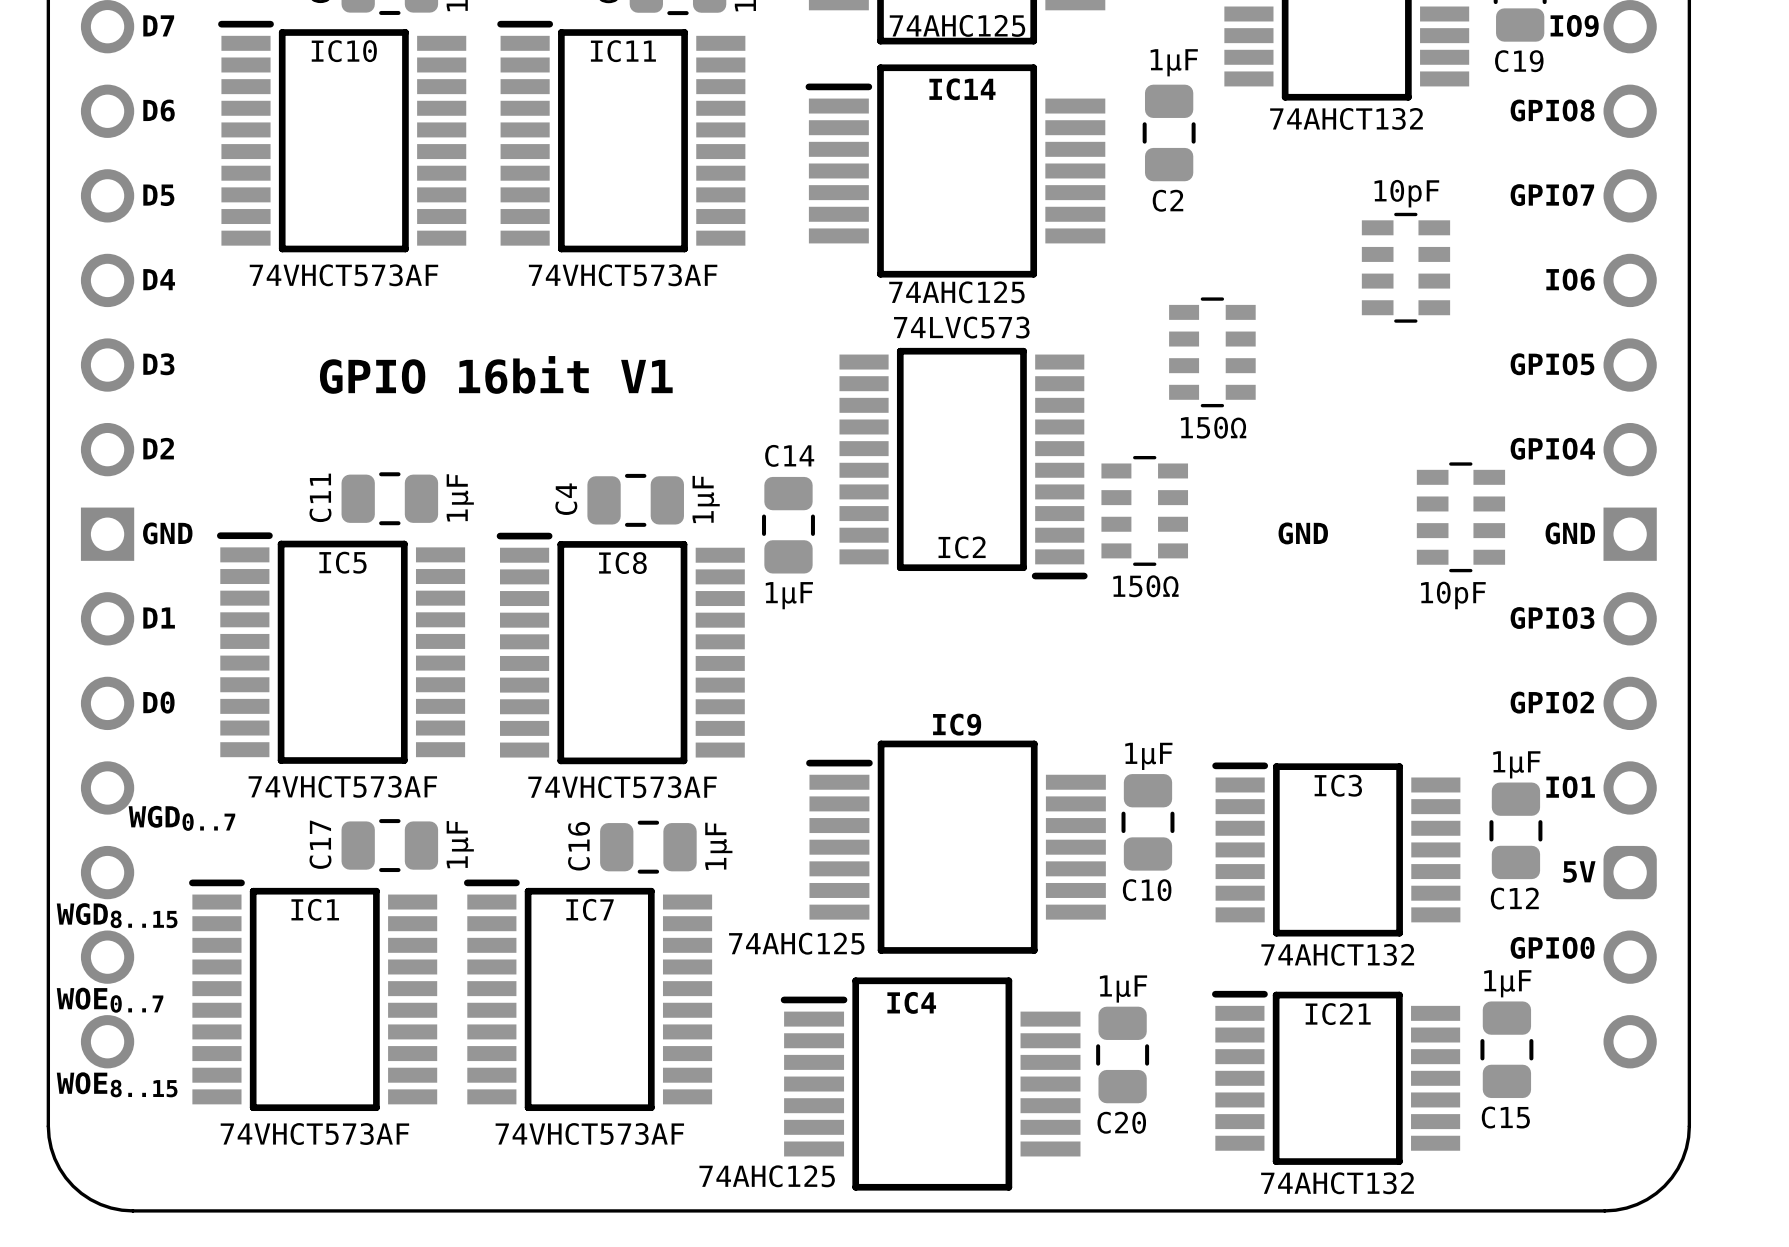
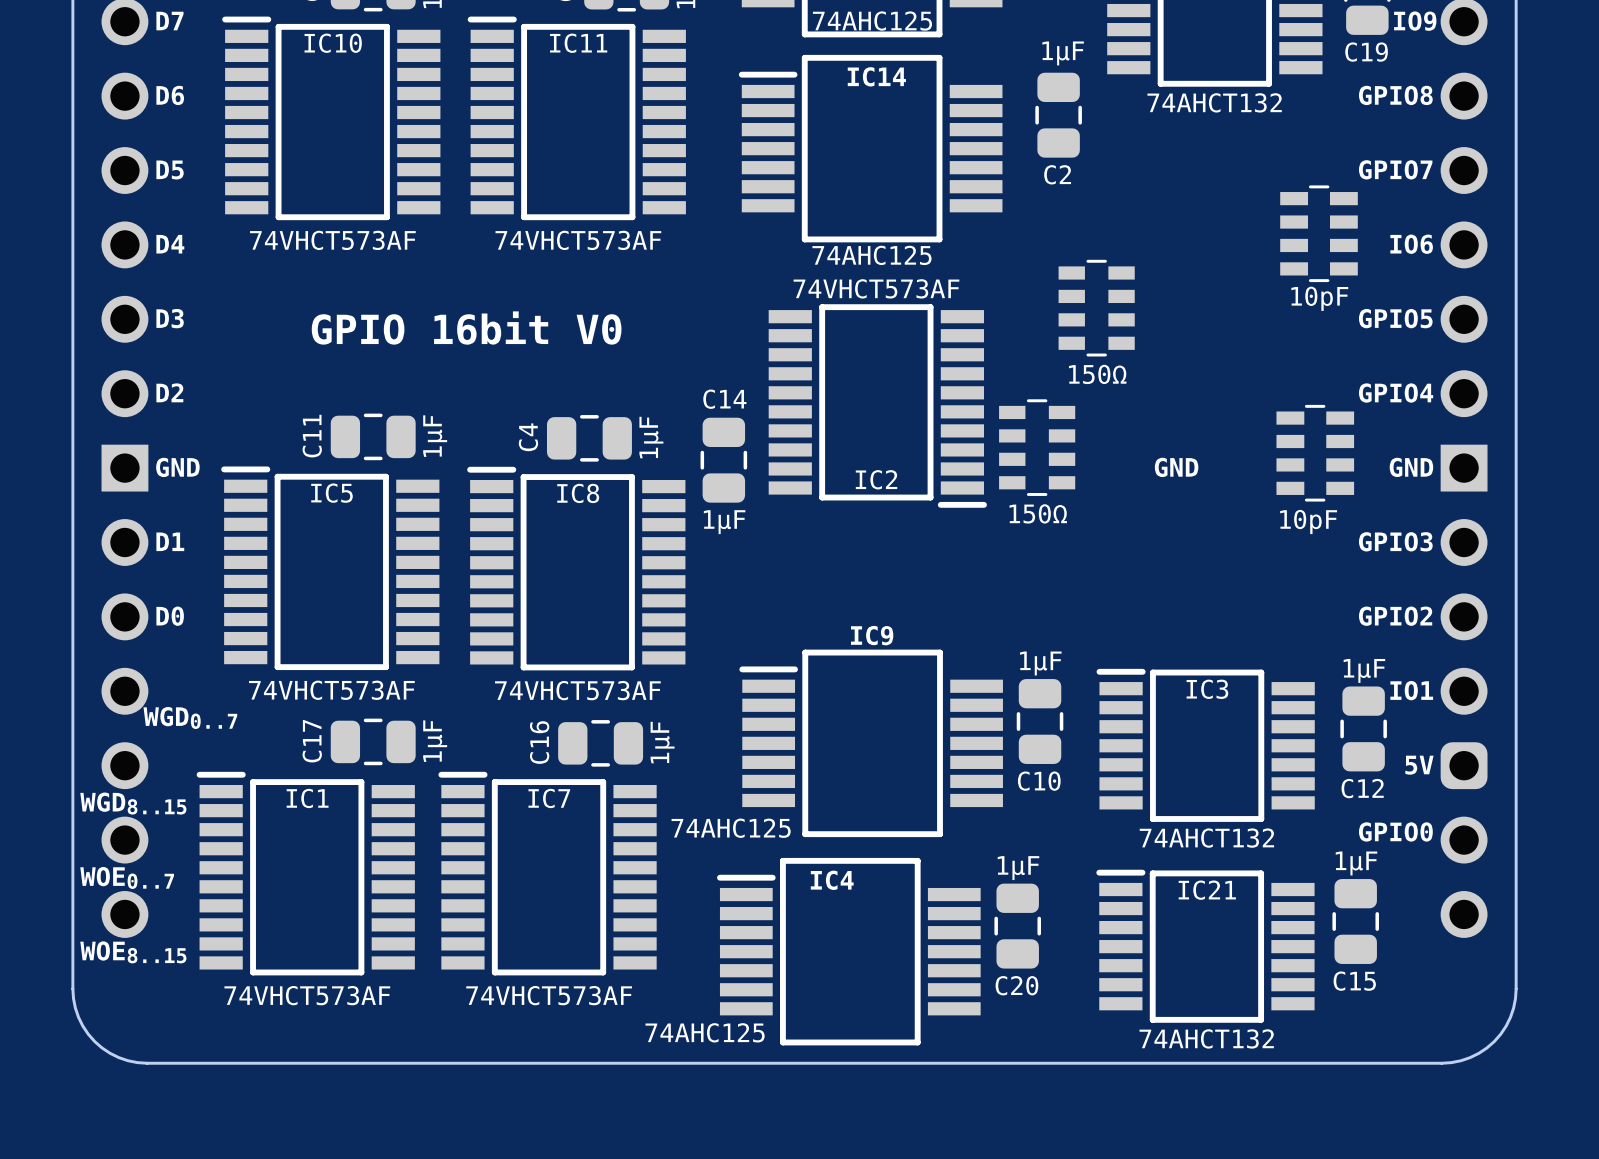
part: (1405, 267) -> none
part: none -> (1319, 233)
IC2 text: 74LVC573 (961, 327) -> none
IC2 text: none -> 74VHCT573AF (876, 288)
text: GPIO 16bit V1 (496, 374) -> GPIO 16bit V0 (466, 328)

